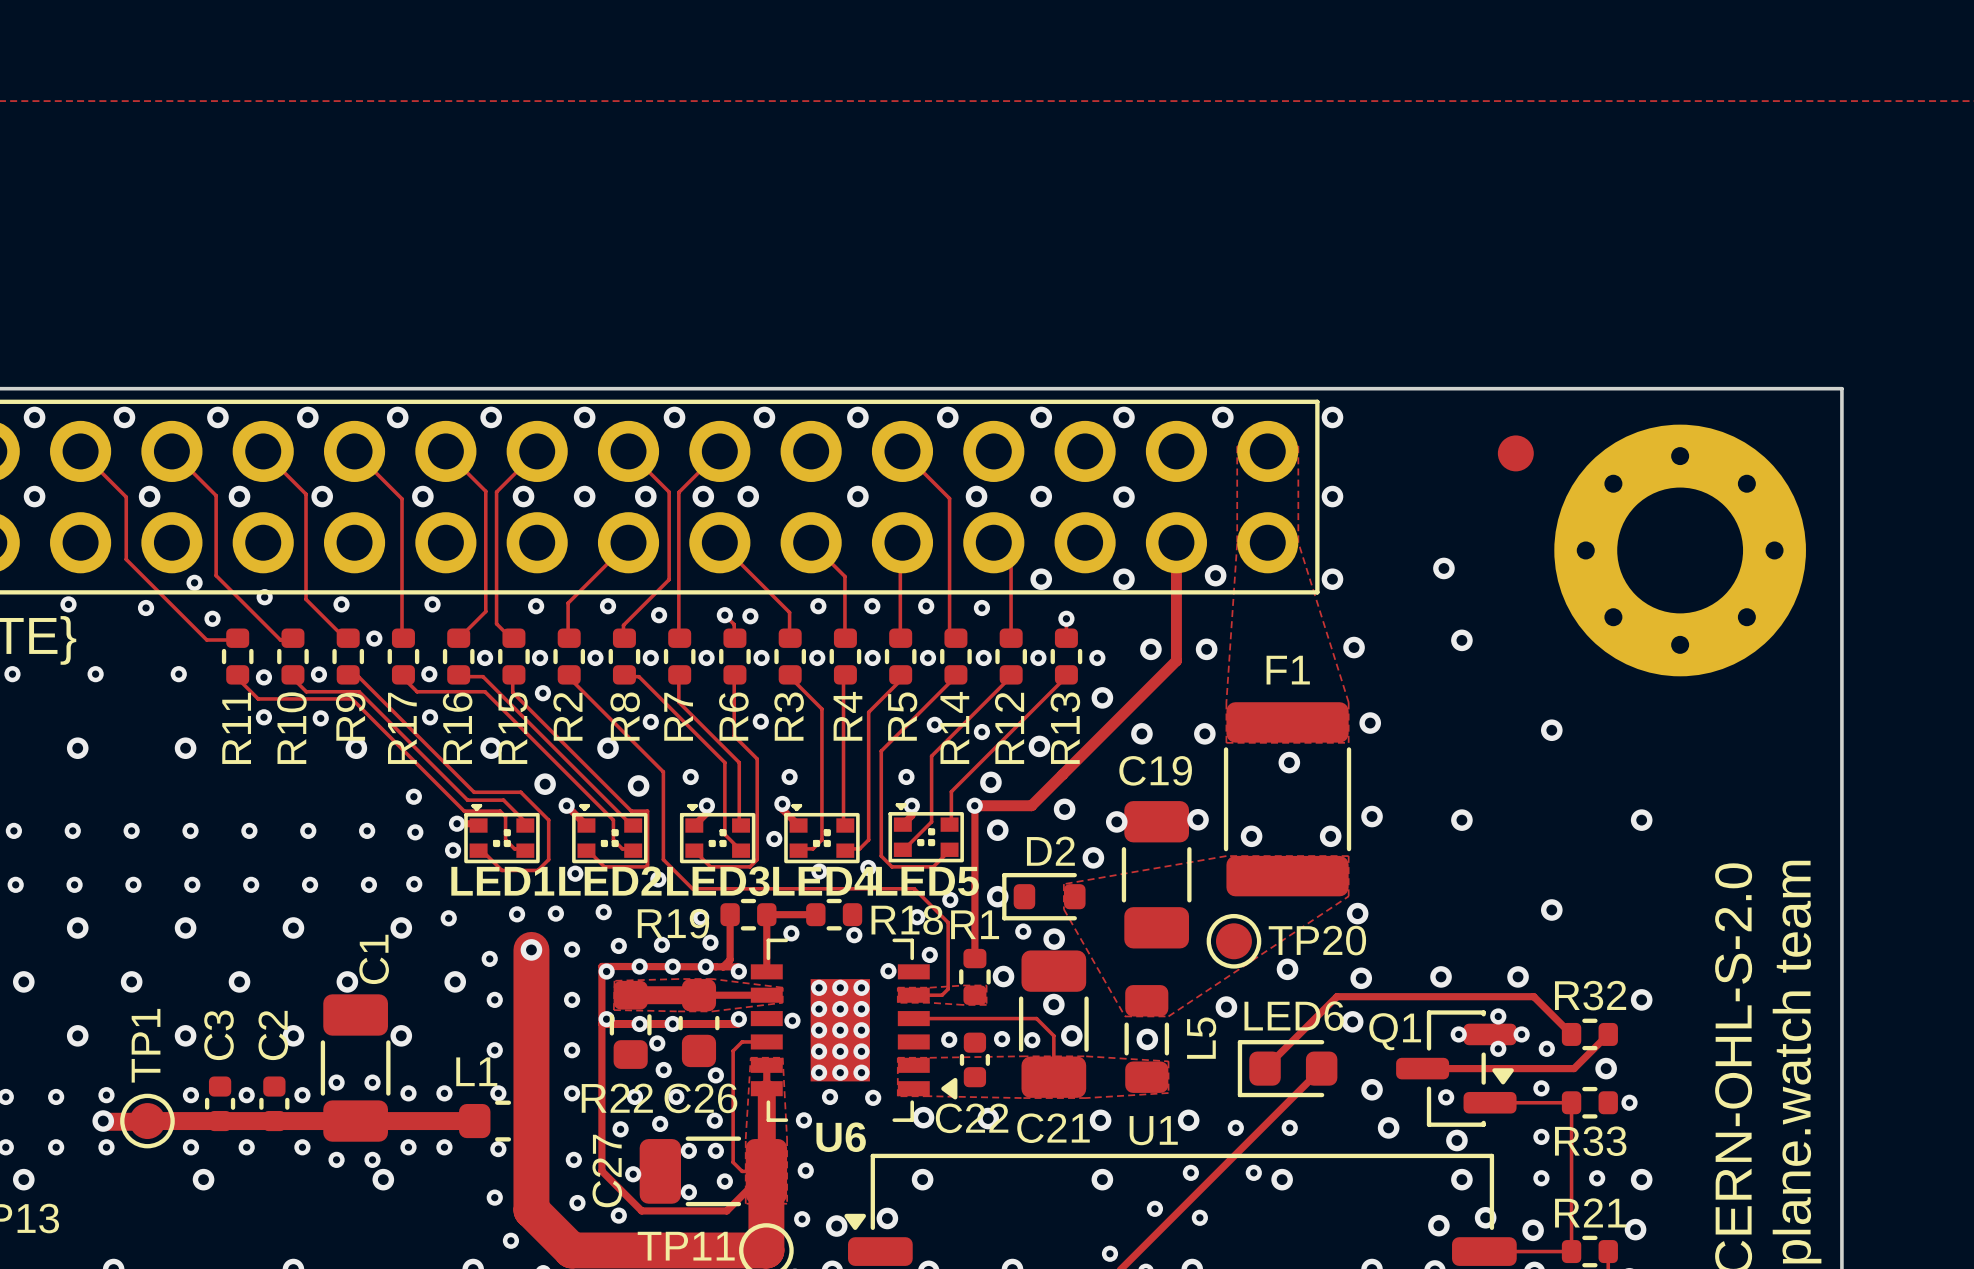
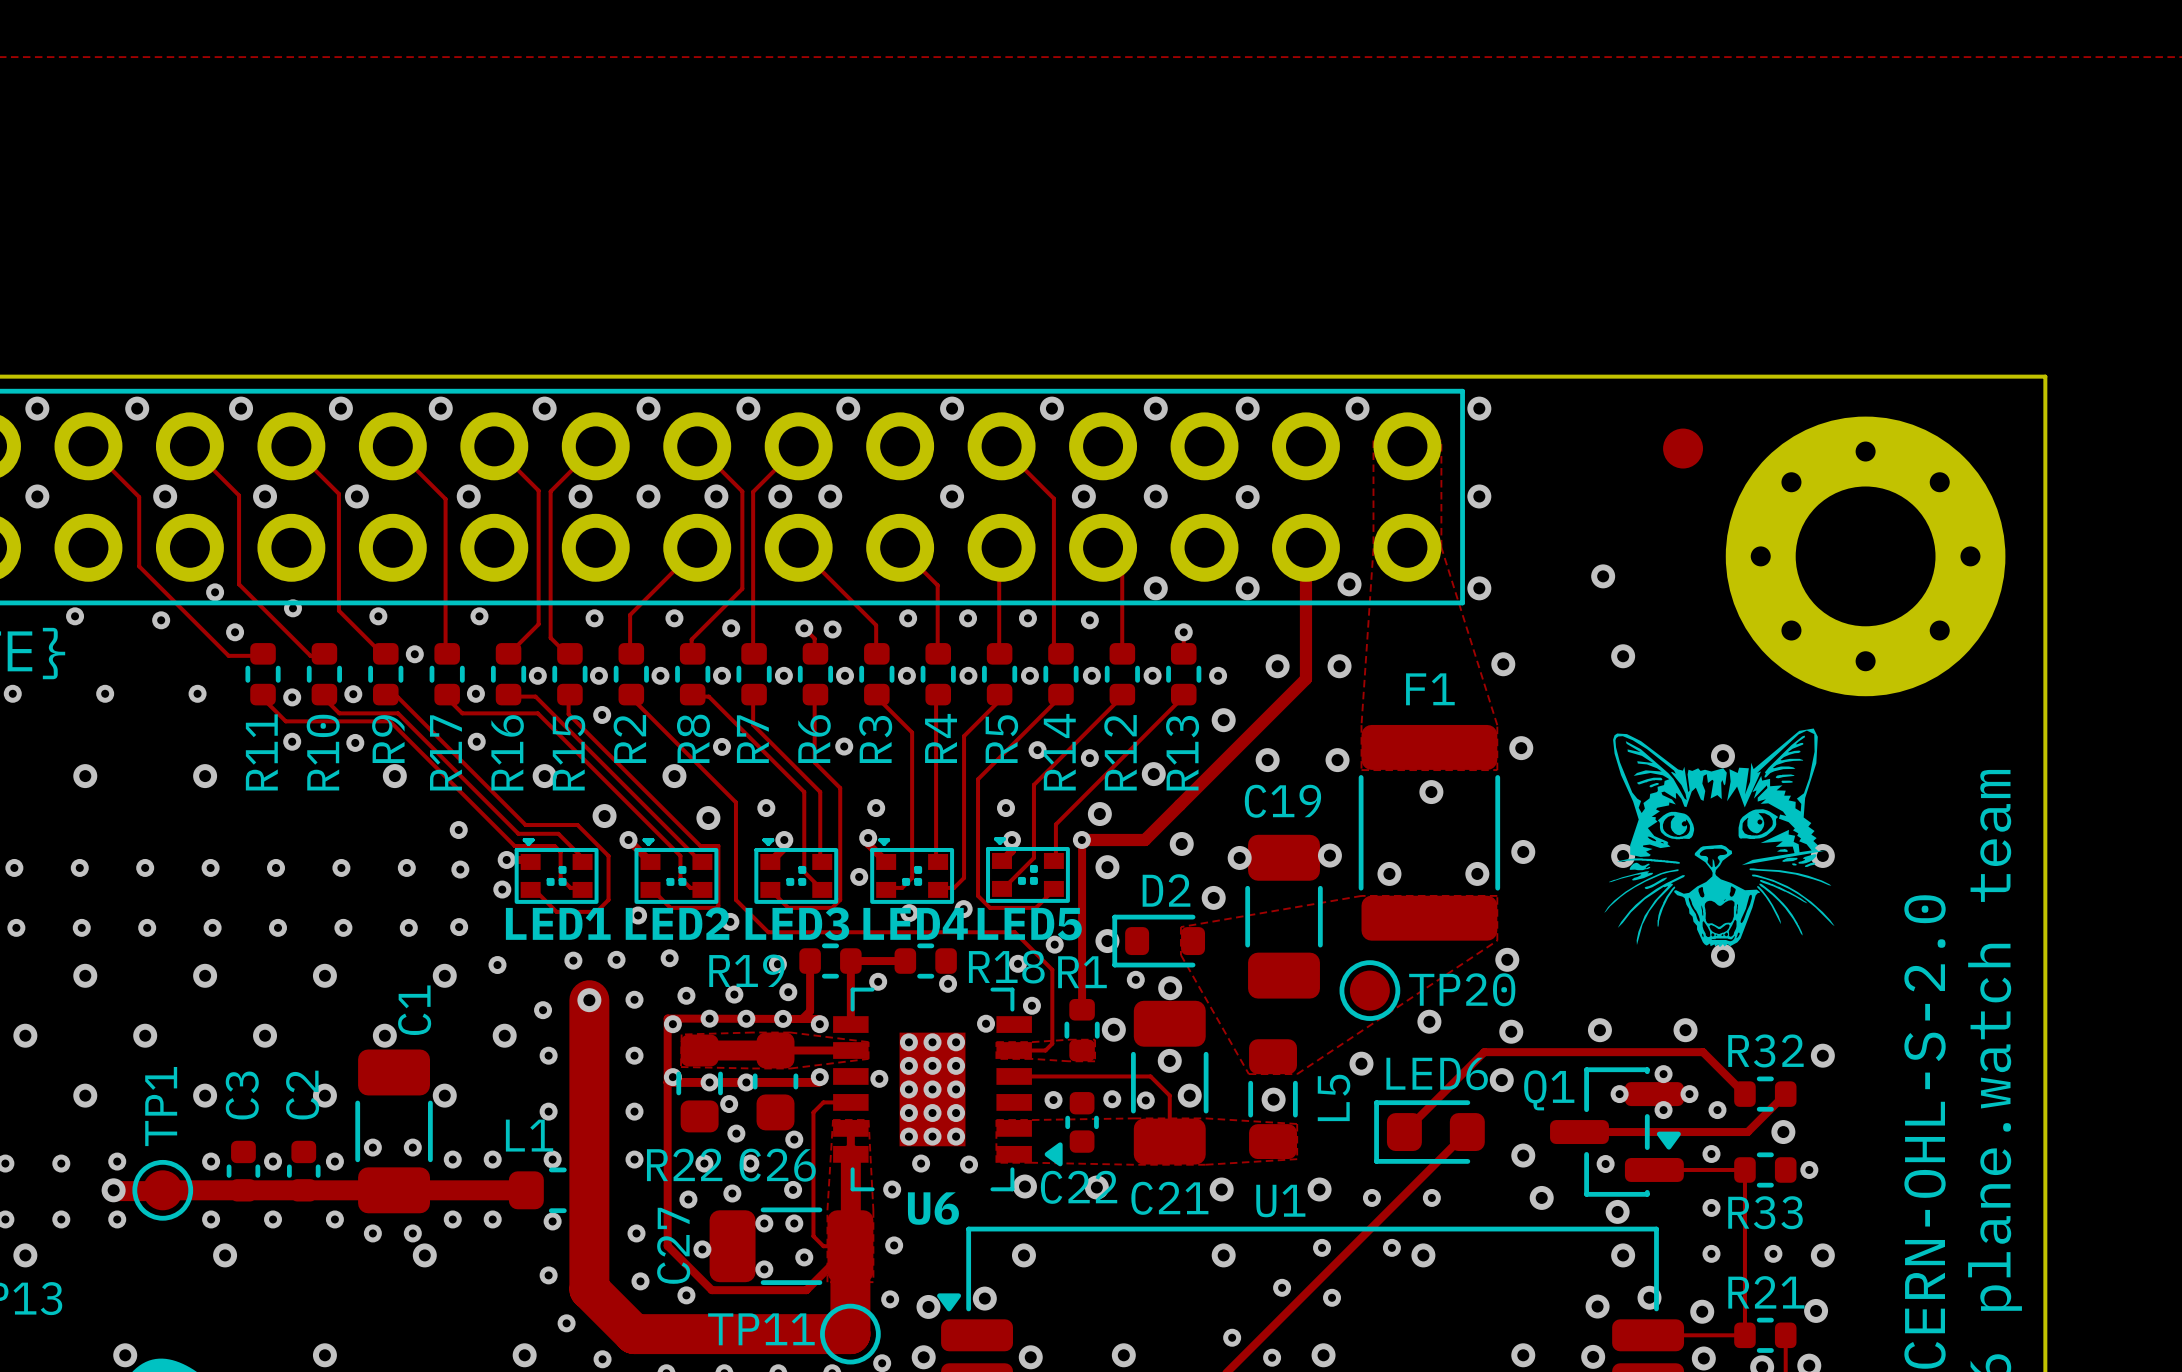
drawing: none -> [1604, 728, 1835, 947]

